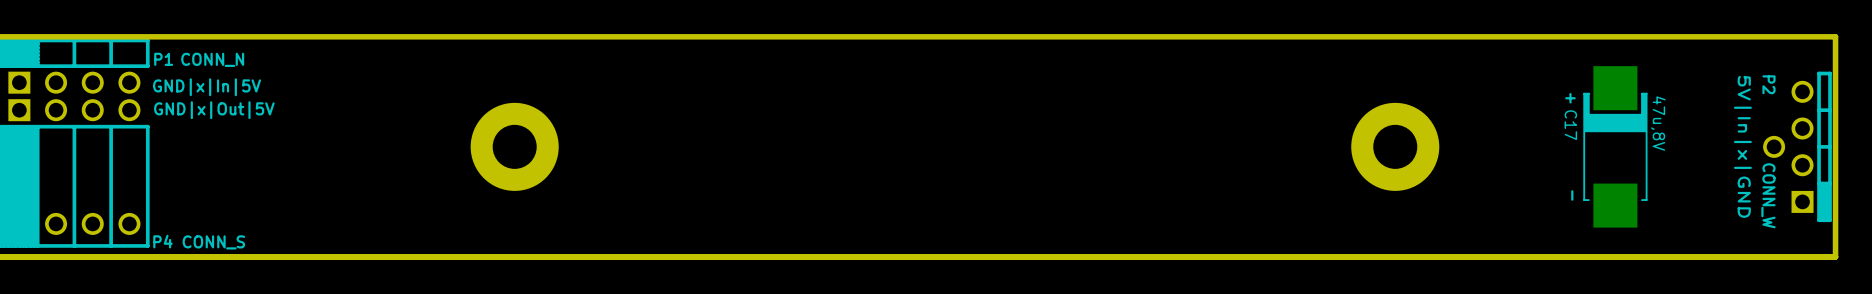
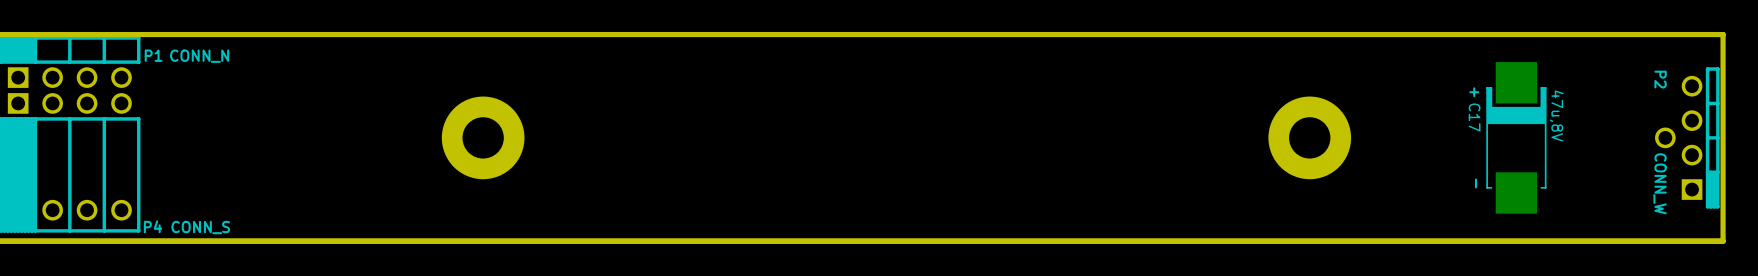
text: GND|x|In|5V (207, 87) -> none
text: GND|x|Out|5V (214, 110) -> none
text: 5V|In|x|GND (1742, 146) -> none

